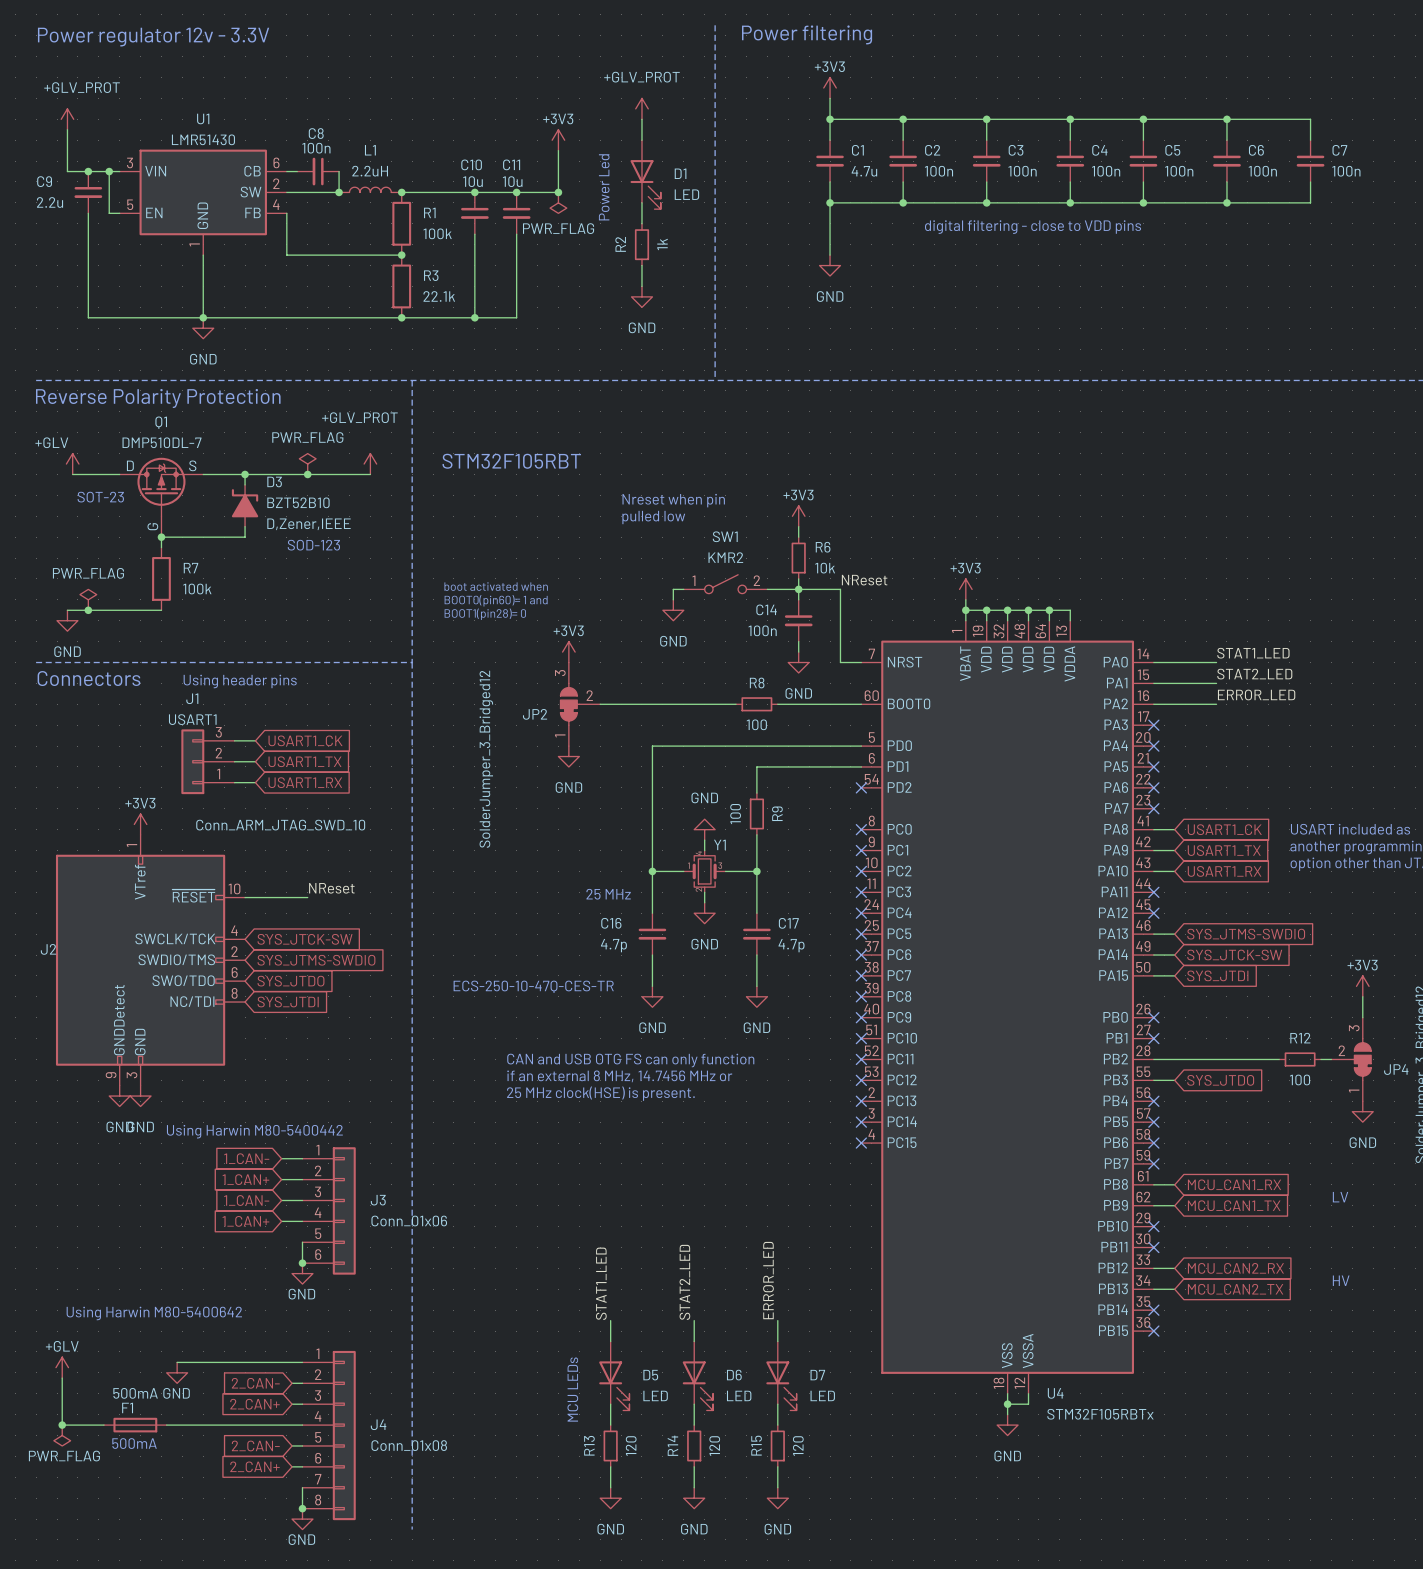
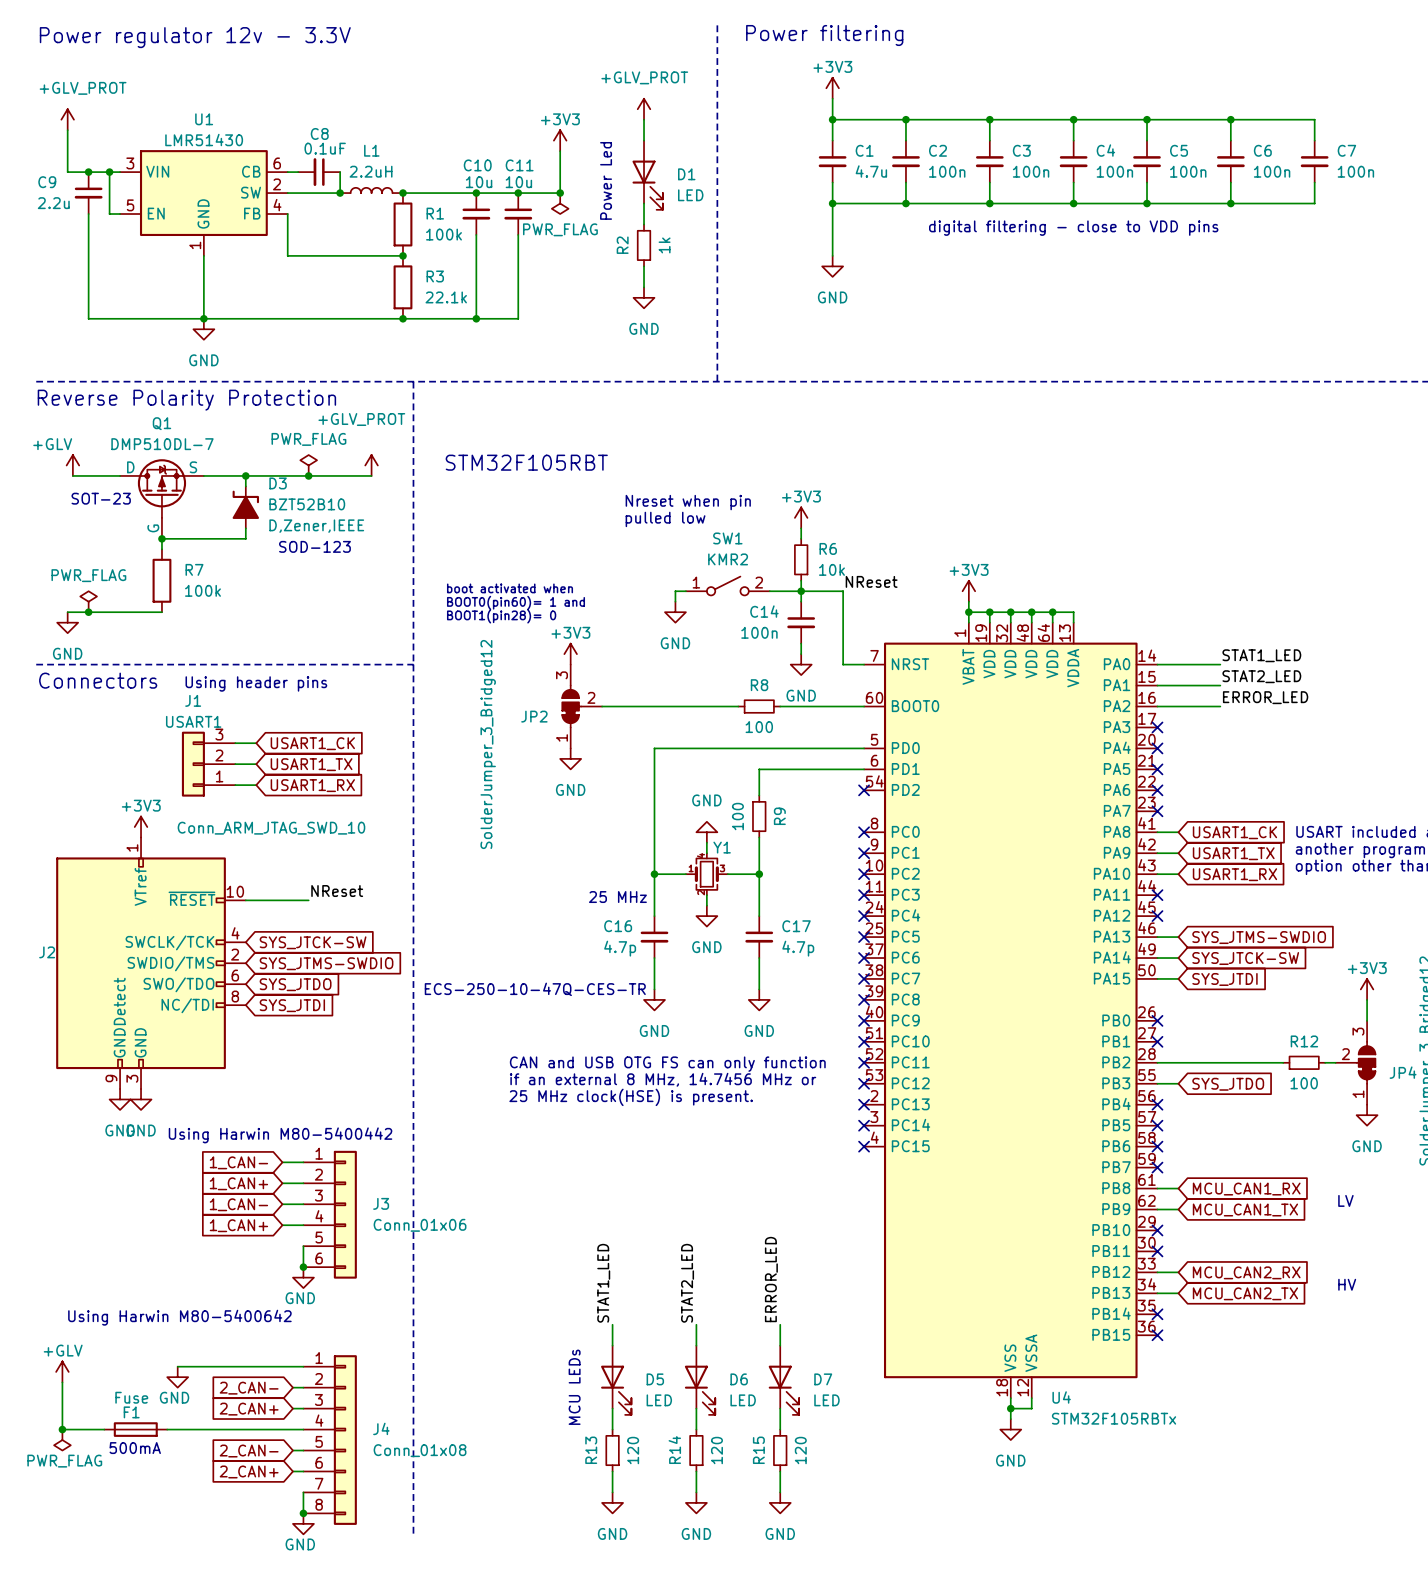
C8 value: 100n (316, 148) -> 0.1uF (325, 148)
F1 value: 500mA (135, 1393) -> Fuse (131, 1397)

